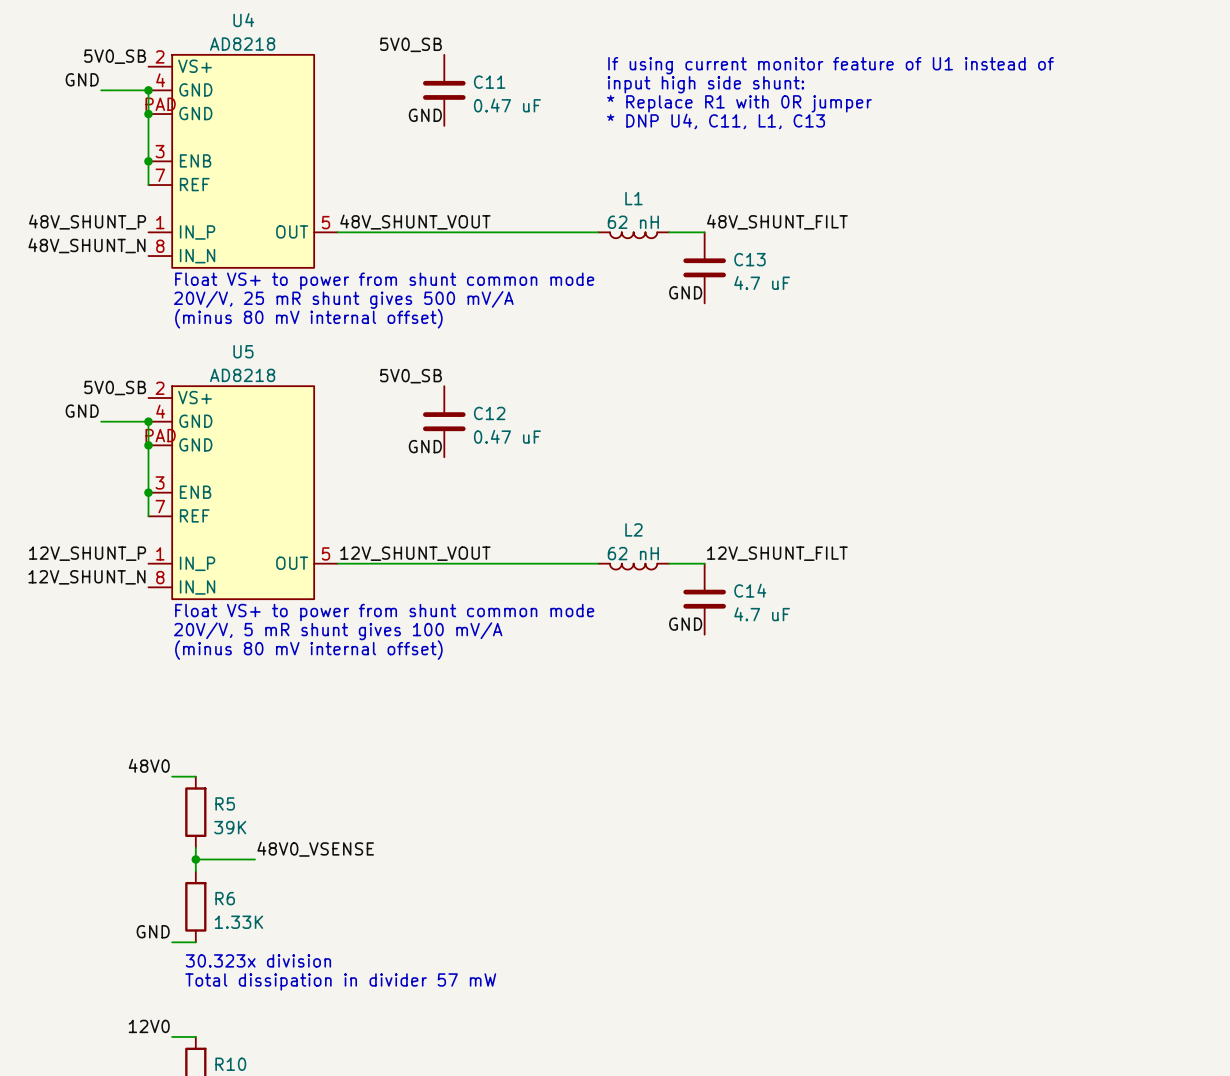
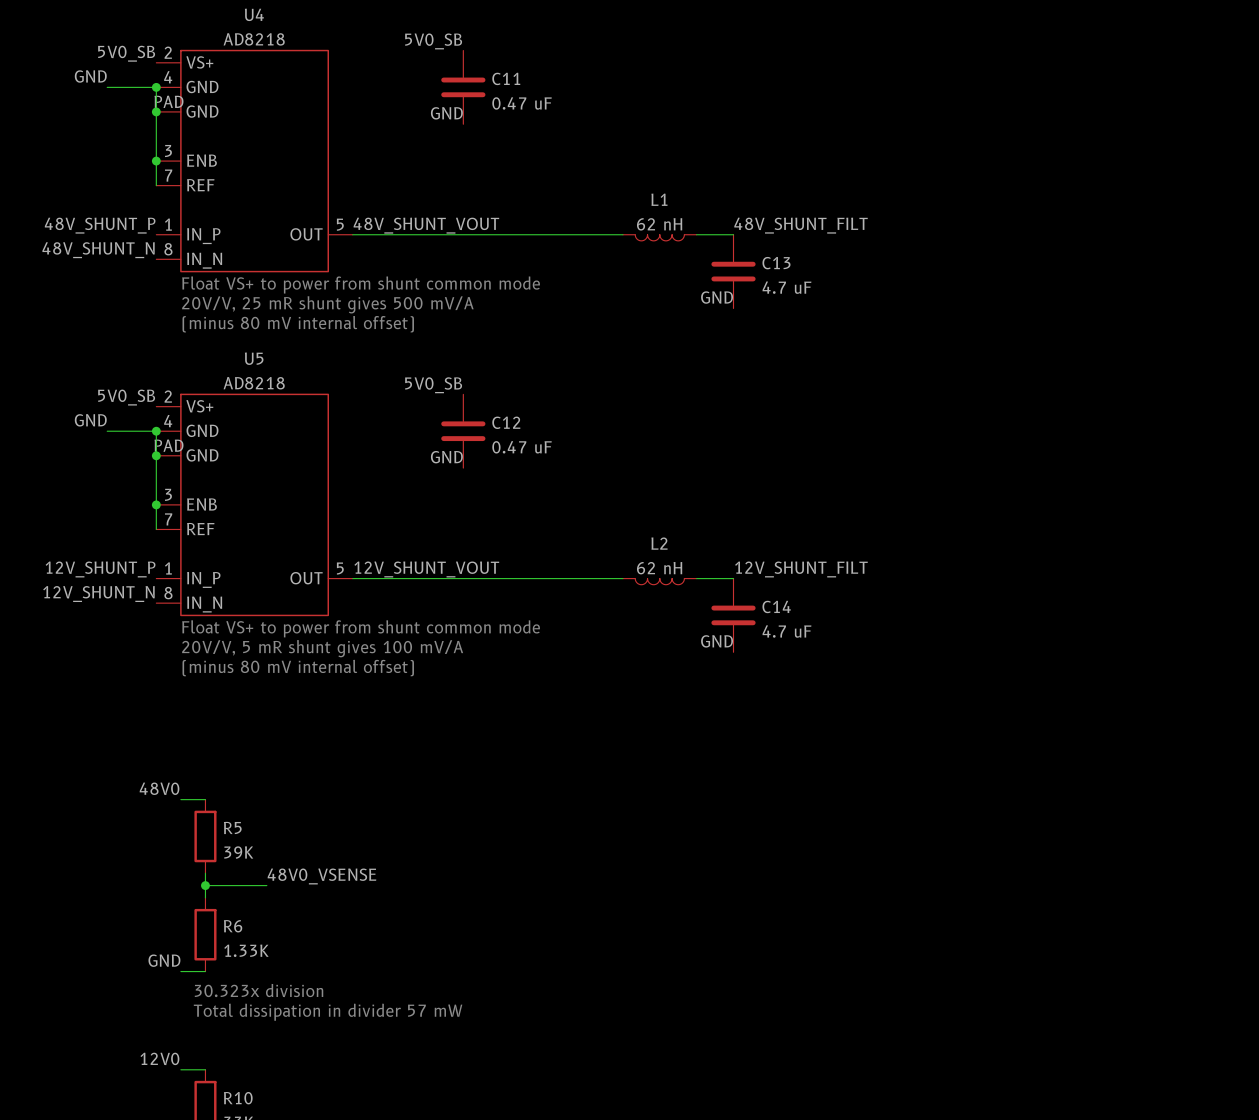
text: If using current monitor feature of U1 instead of (831, 65) -> none
text: input high side shunt: (705, 84) -> none
text: * Replace R1 with 0R jumper (739, 103) -> none
text: * DNP U4, C11, L1, C13 (716, 121) -> none

